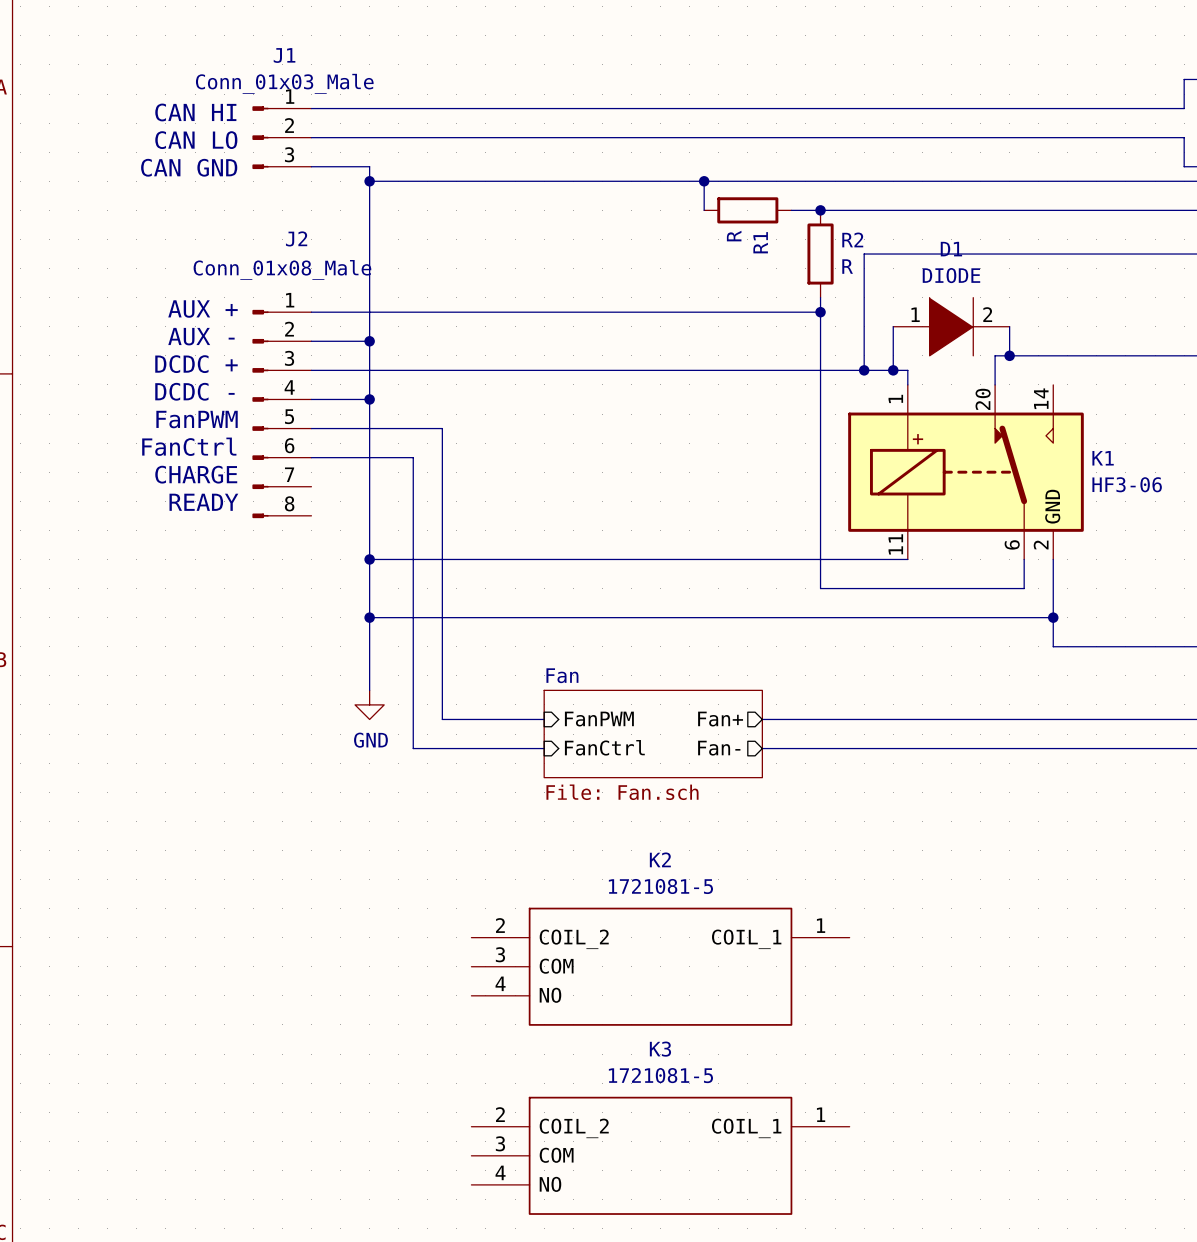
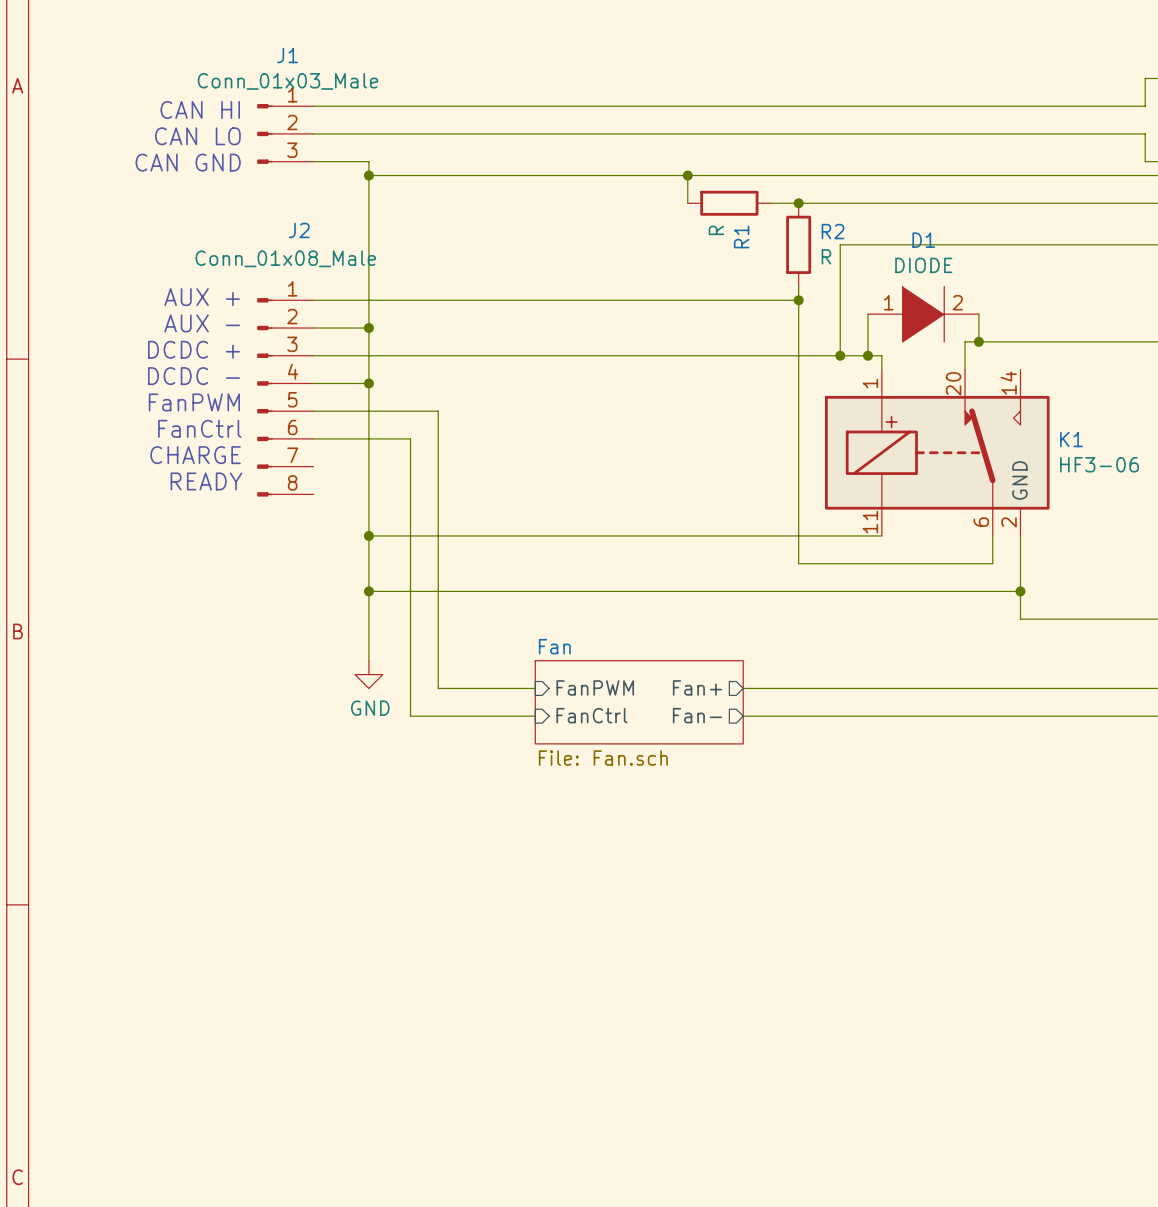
K2: 1721081-5 (660, 966) -> none
K3: 1721081-5 (660, 1155) -> none

